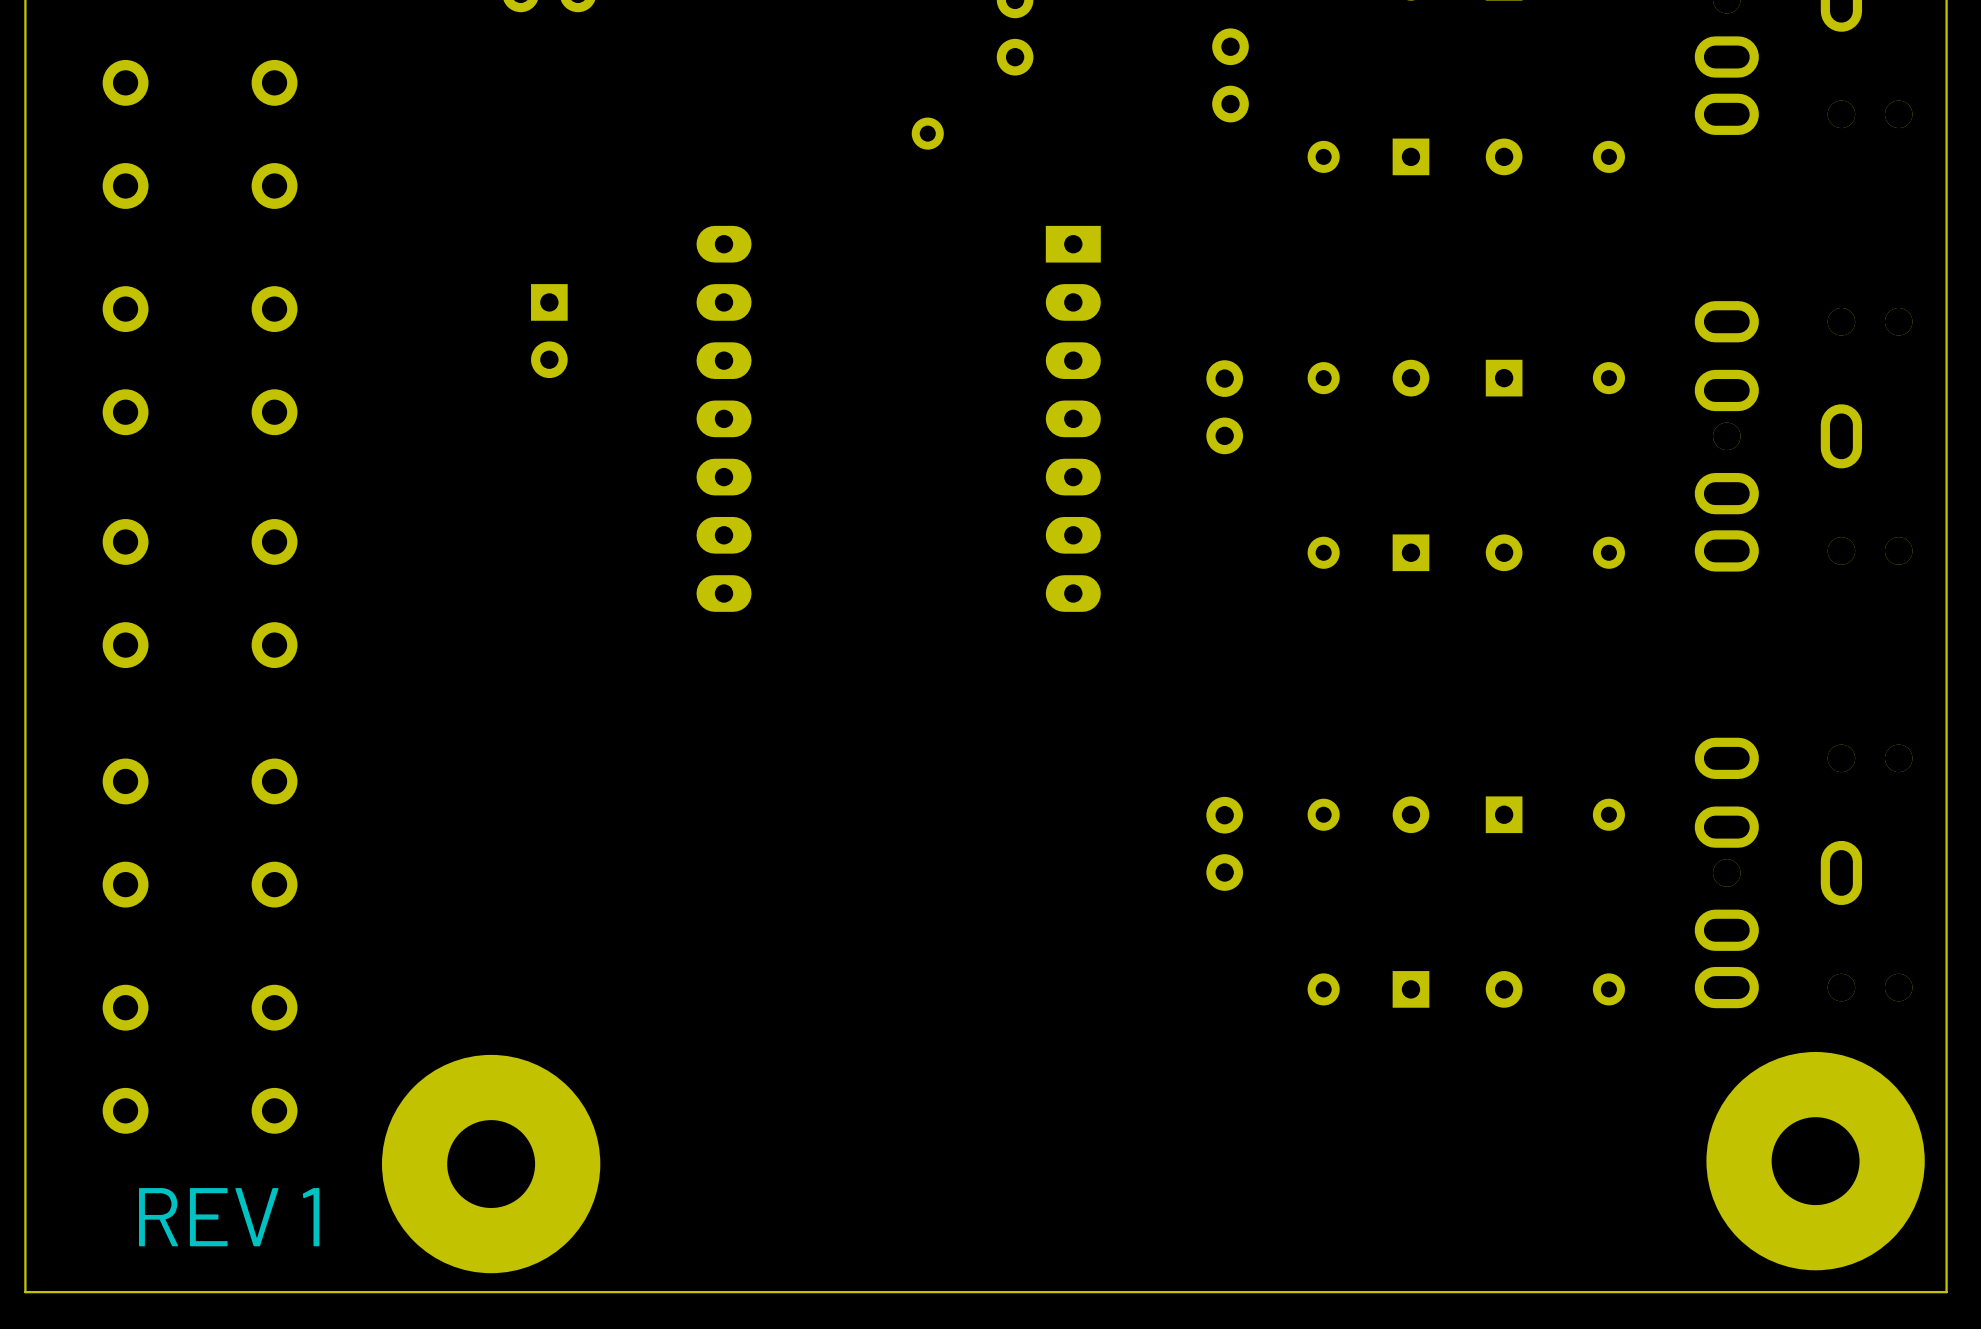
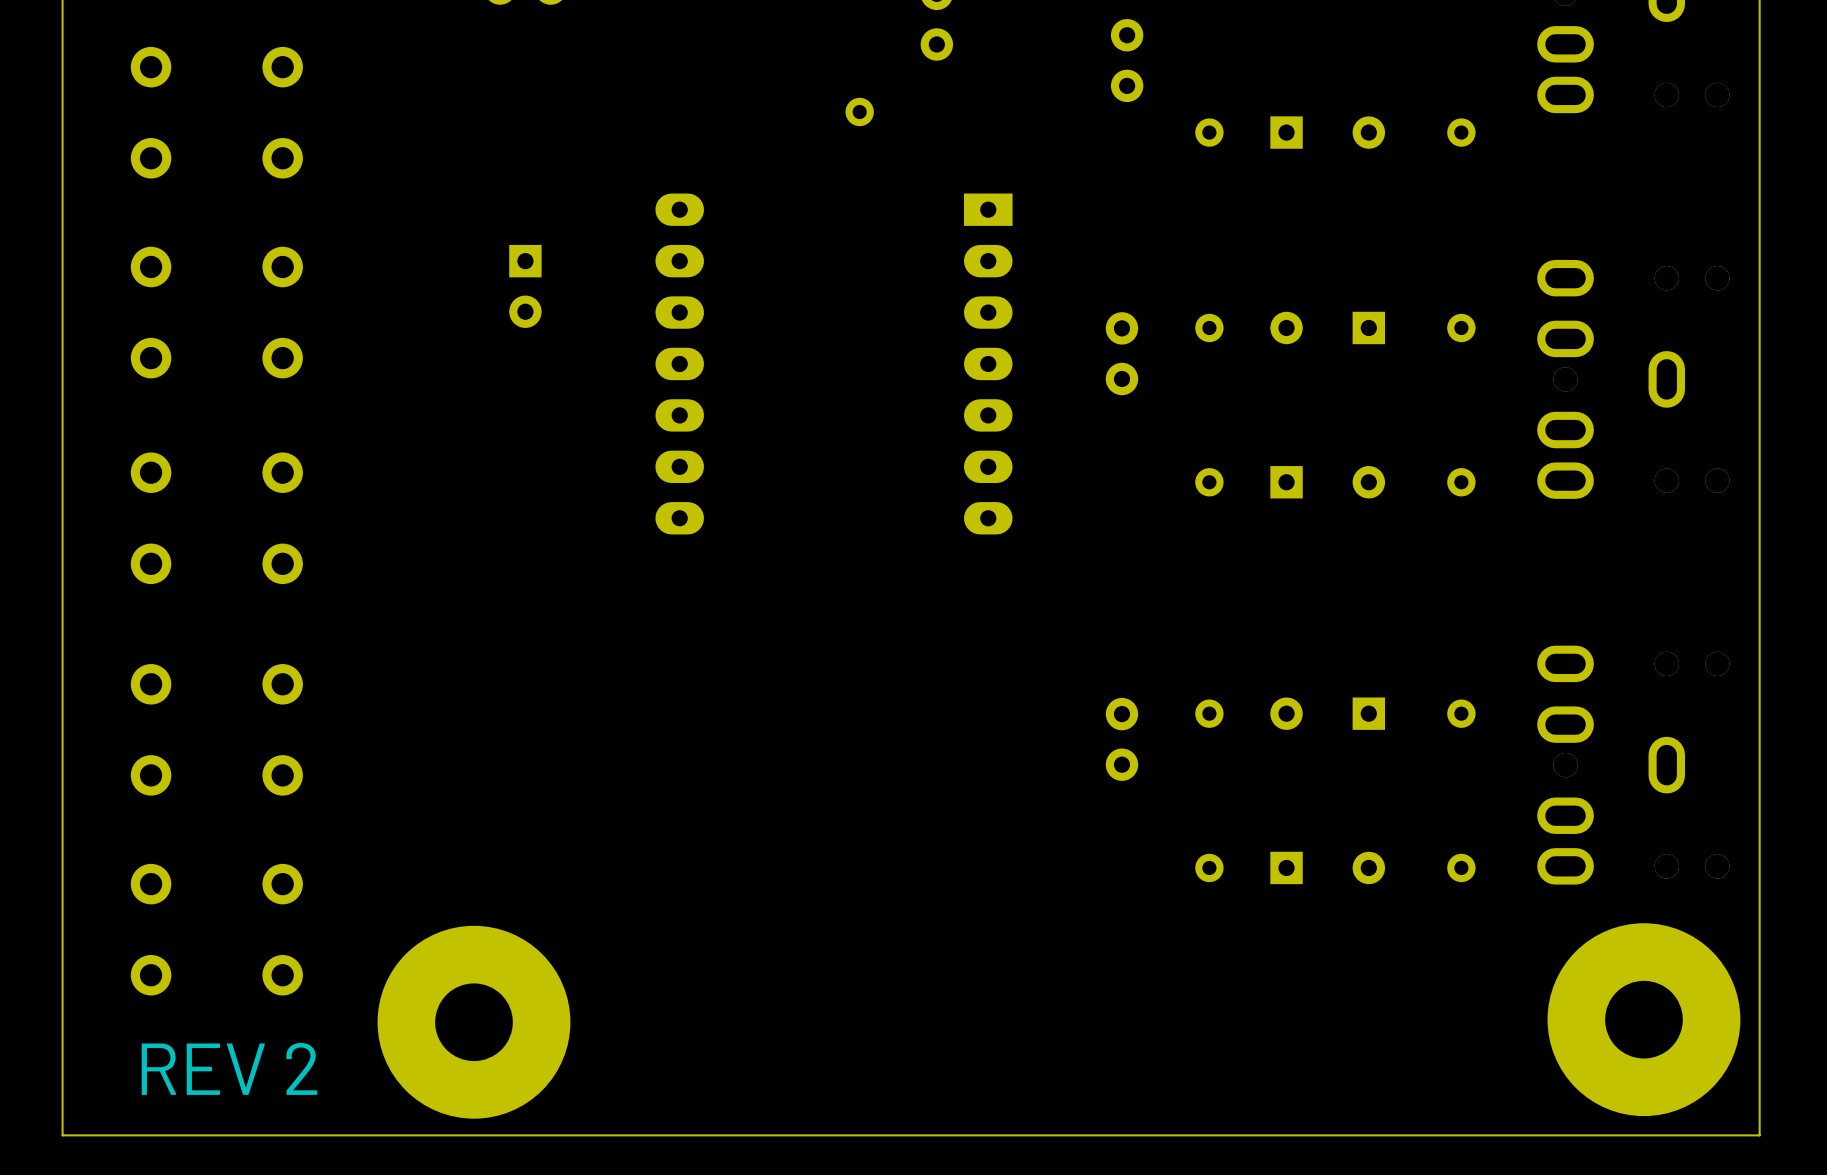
text: REV 1 (229, 1217) -> REV 2 (229, 1068)

